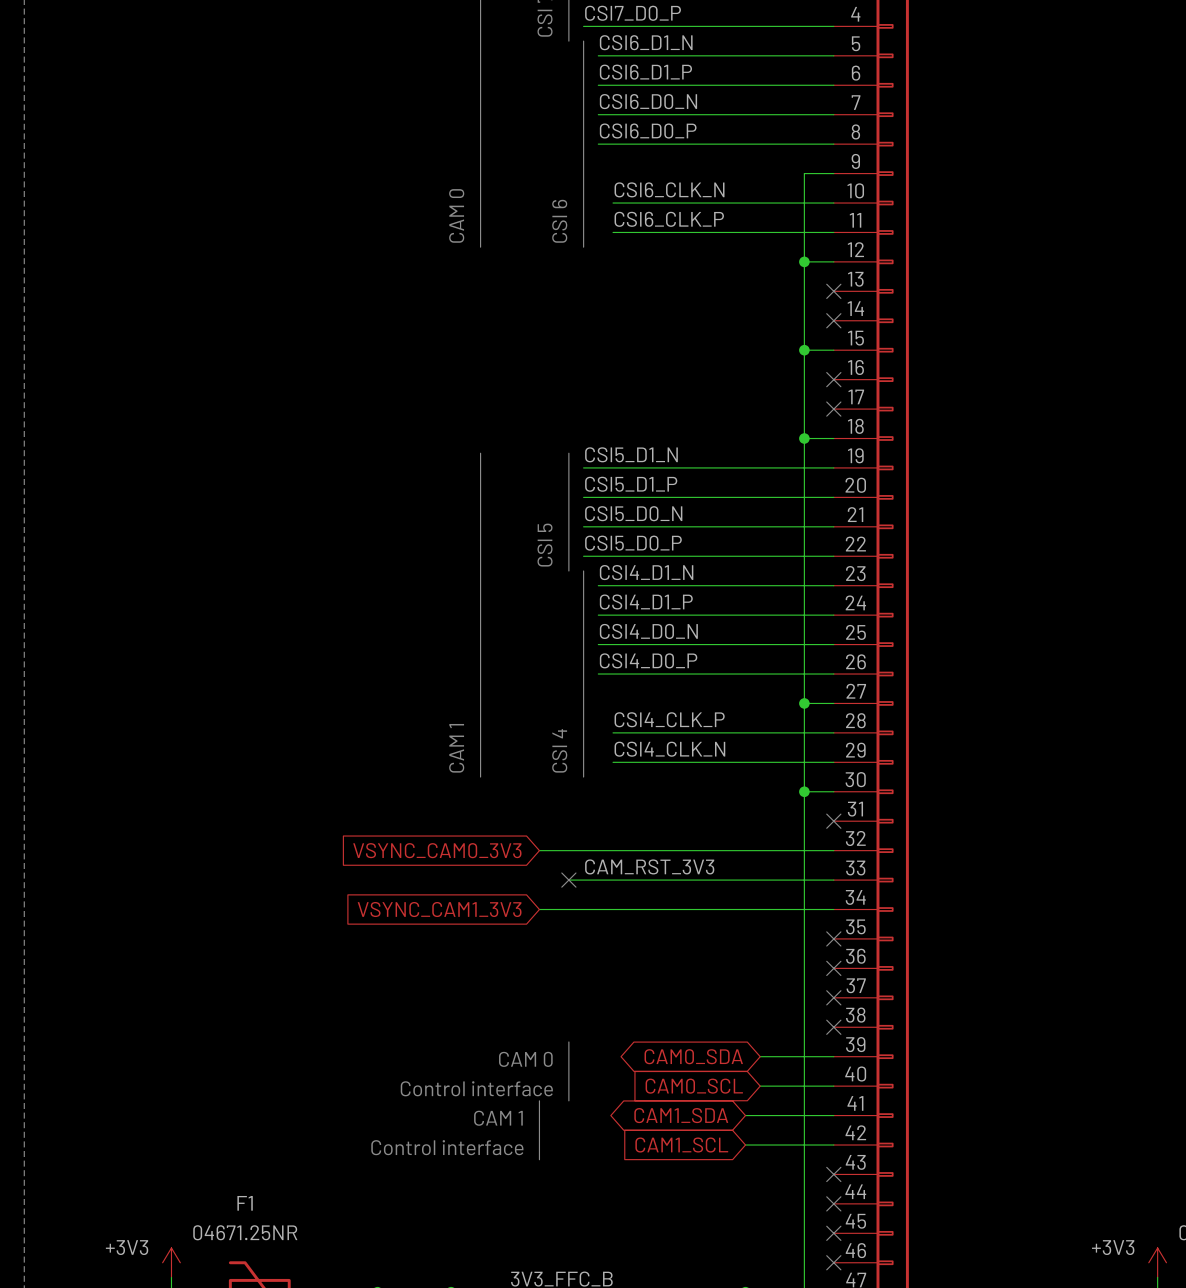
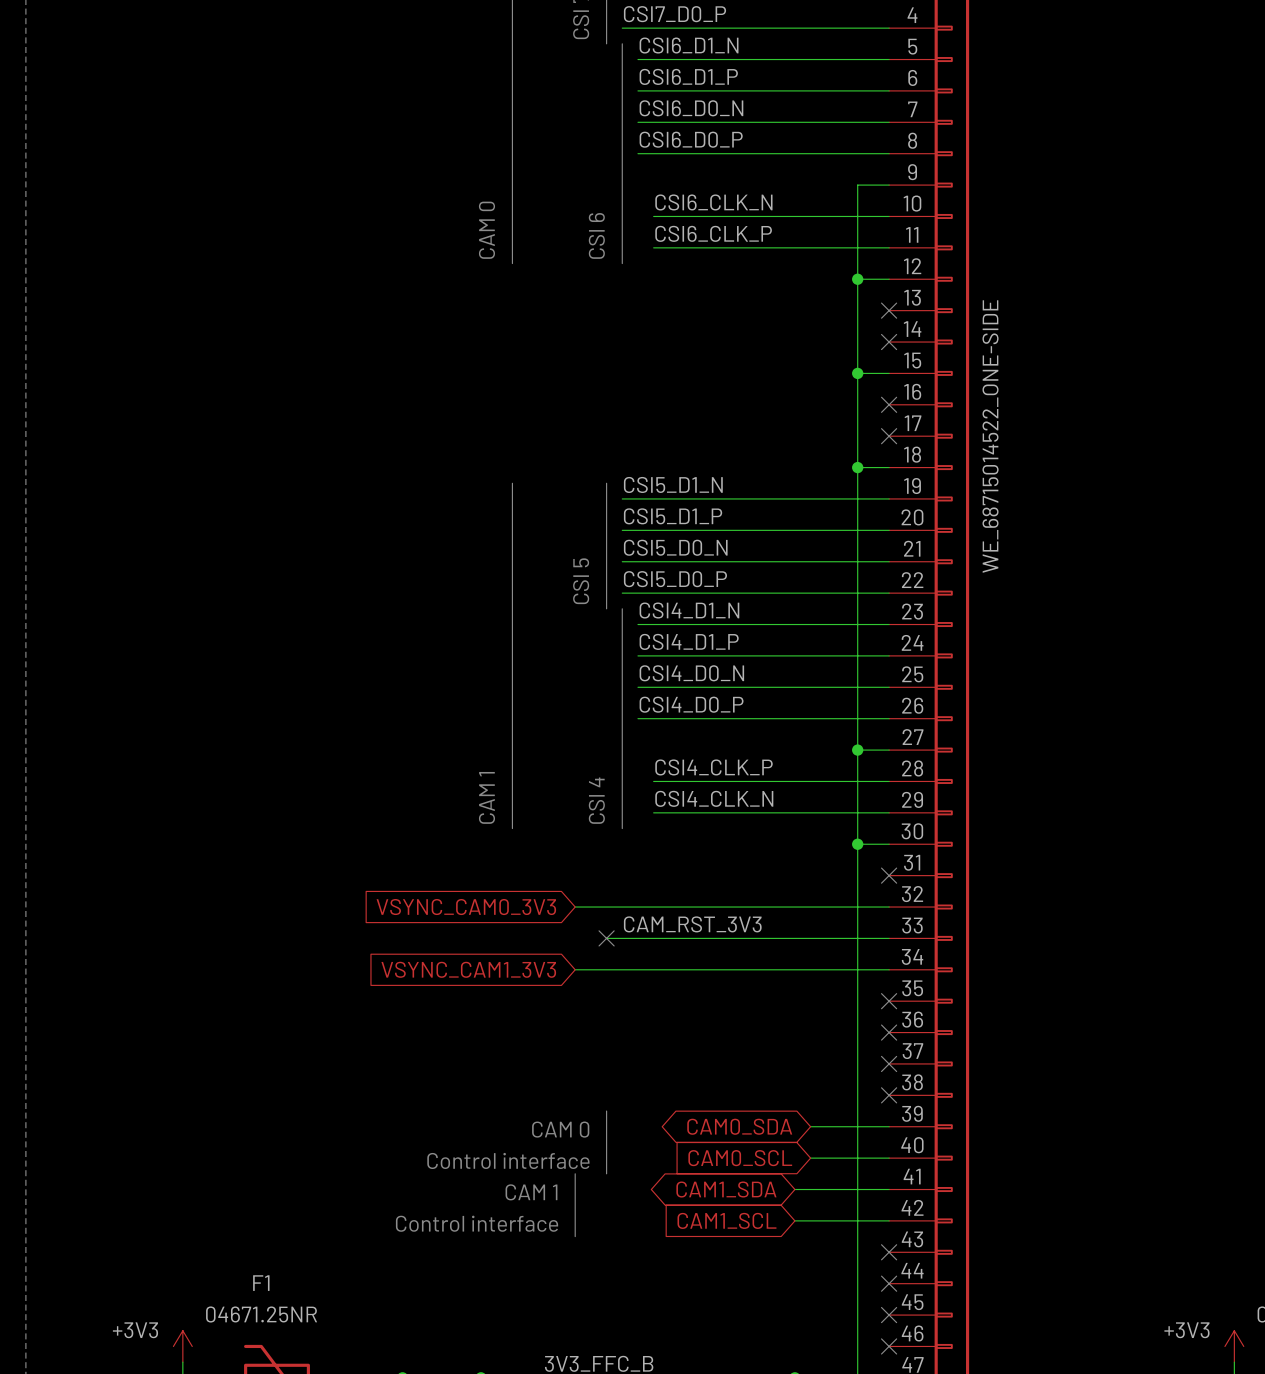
part value: none -> WE_68715014522_ONE-SIDE (990, 436)

